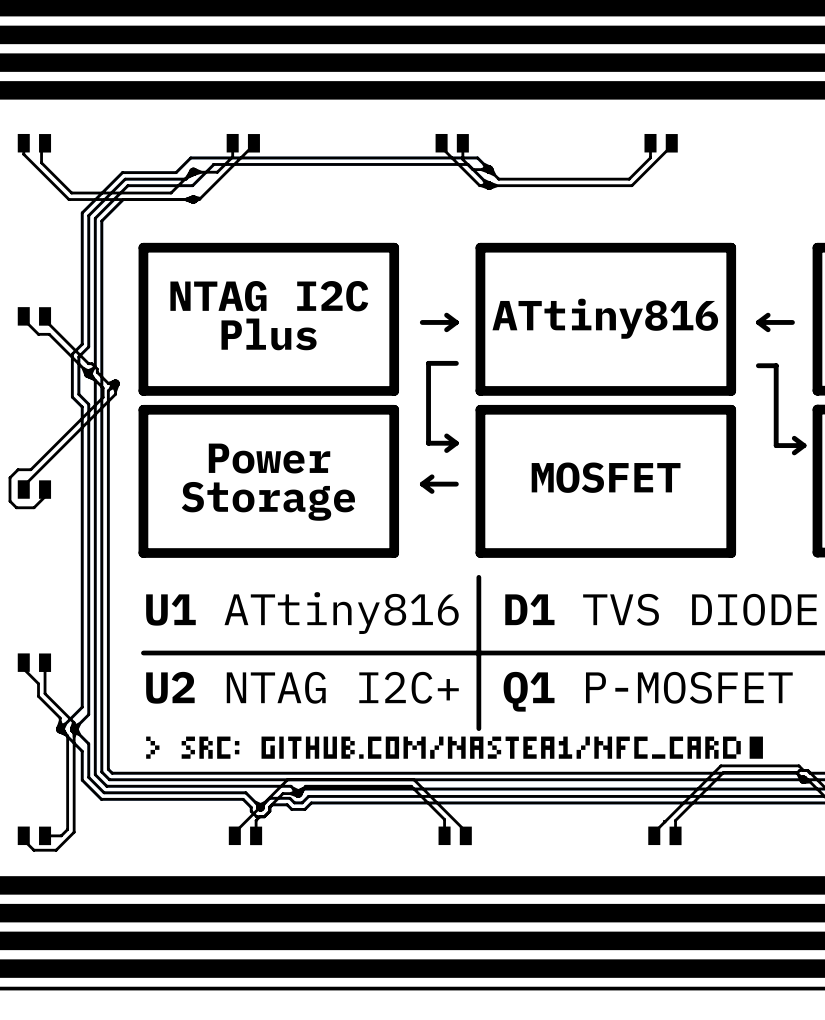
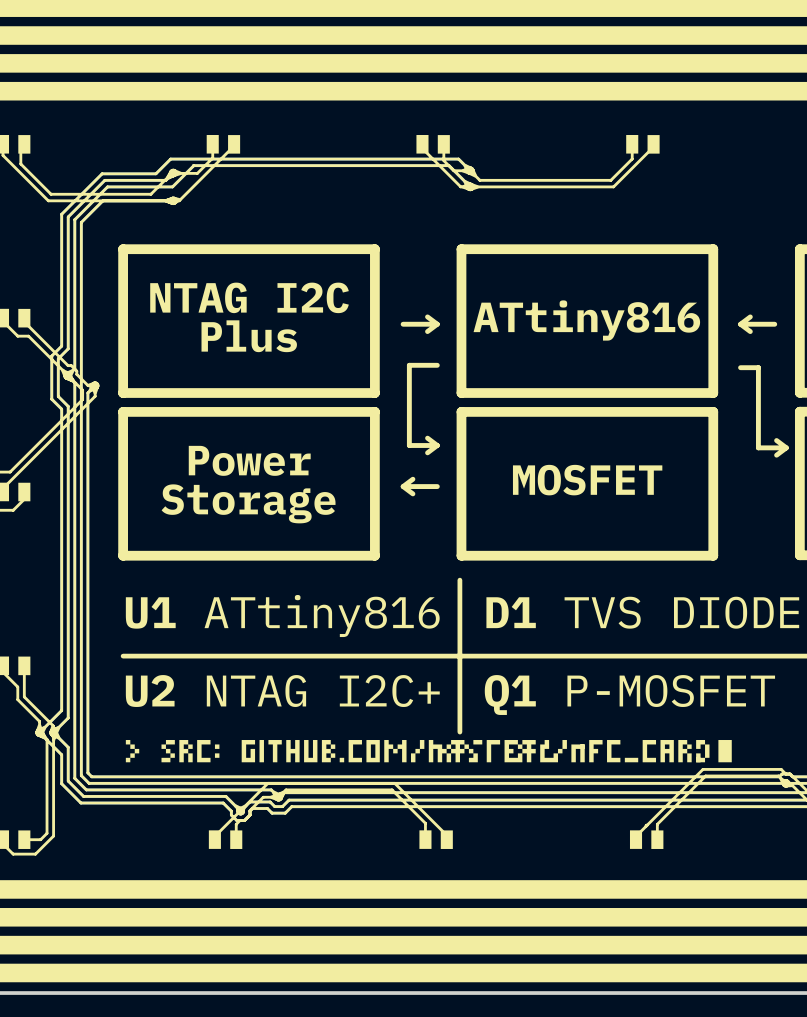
drawing: [461, 736, 515, 759] -> none
drawing: none -> [517, 740, 732, 763]
drawing: [541, 736, 763, 759] -> none
drawing: none -> [437, 744, 492, 763]

